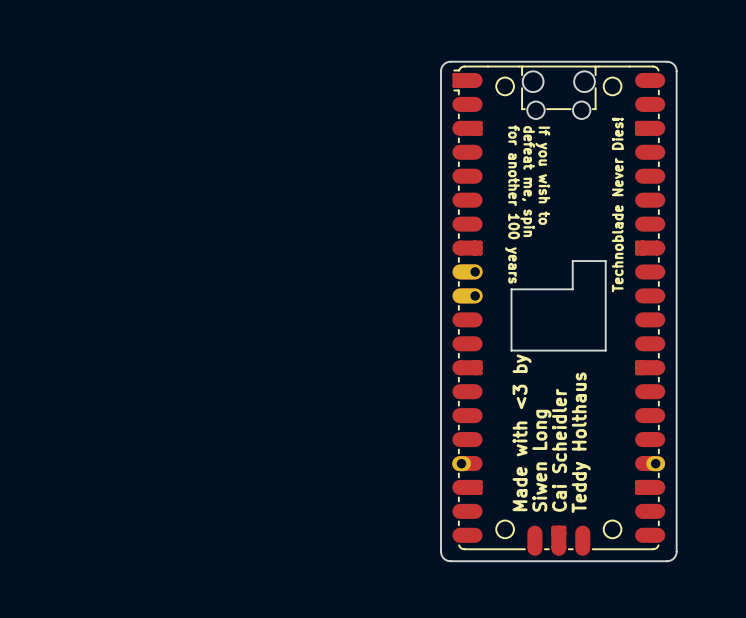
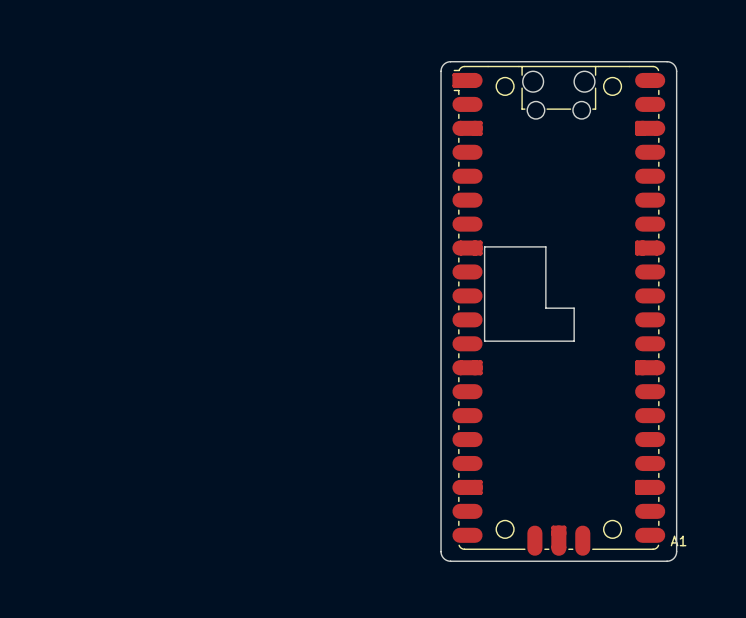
text: If you wish to (542, 175) -> none
text: defeat me, spin (527, 181) -> none
text: for another 100 years (512, 204) -> none
text: Technoblade Never Dies! (617, 204) -> none
part: (467, 271) -> none
part: (467, 295) -> none
part rotation: 0° (558, 305) -> 90° clockwise (529, 294)
text: Made with <3 by (522, 432) -> none
text: Teddy Holthaus (581, 442) -> none
text: Cai Scheidler (559, 450) -> none
text: Siwen Long (541, 460) -> none
part: (461, 463) -> none
part: (655, 463) -> none
A1 name: none -> A1 (678, 540)

